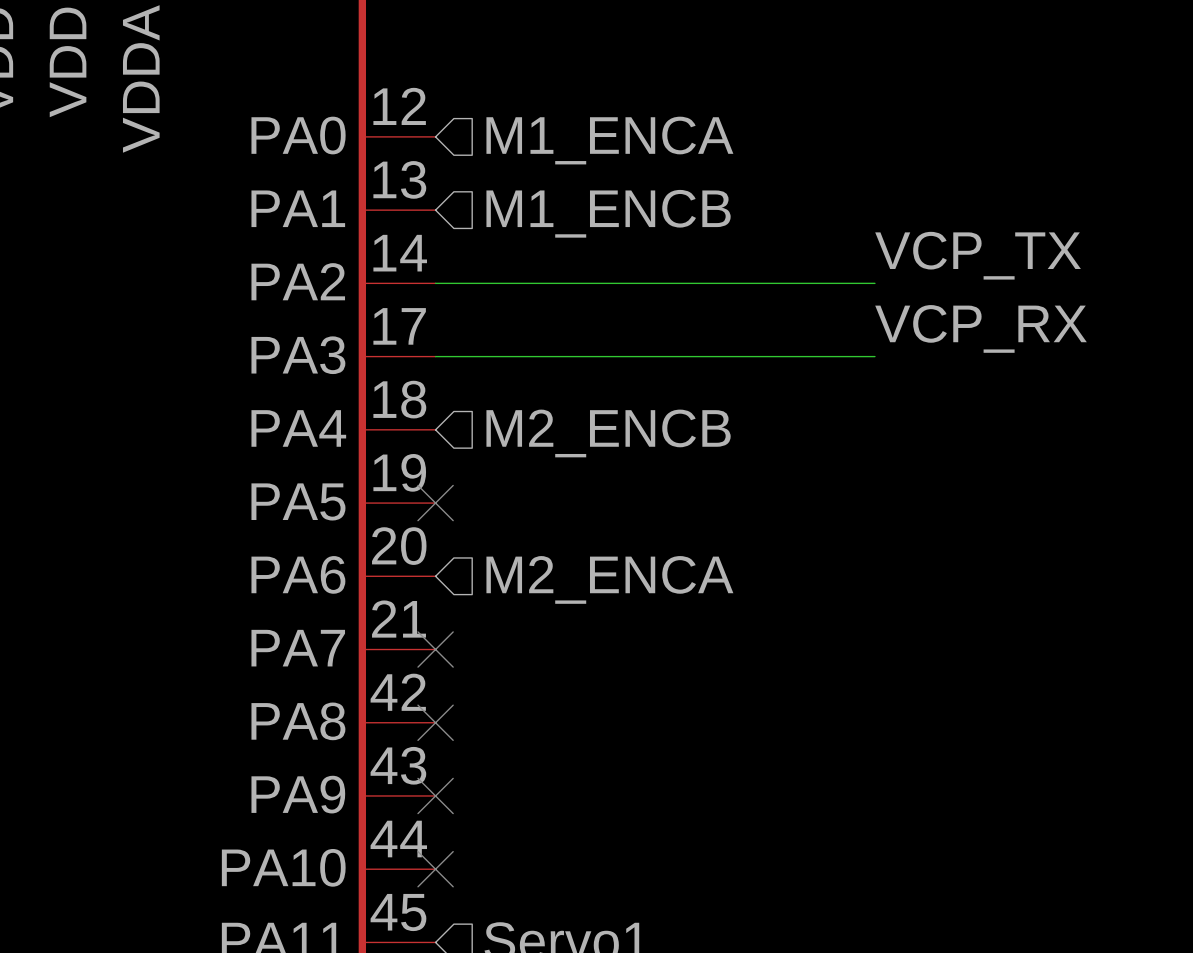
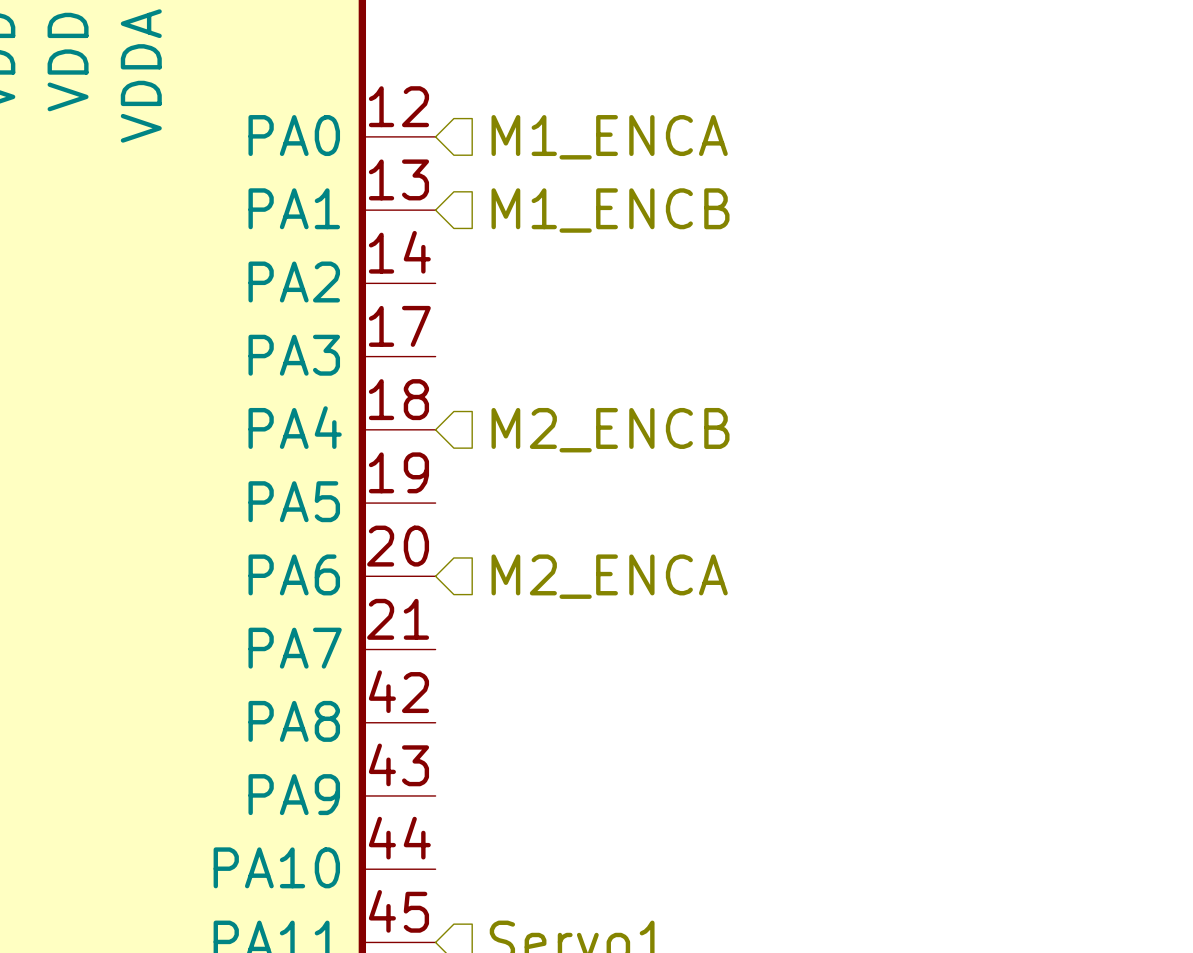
label: VCP_TX (978, 255) -> none
wire: (435, 283) (874, 283) -> none
label: VCP_RX (981, 328) -> none
wire: (435, 356) (874, 356) -> none
no-connect mark: (435, 503) -> none
no-connect mark: (435, 649) -> none
no-connect mark: (435, 722) -> none
no-connect mark: (435, 795) -> none
no-connect mark: (435, 869) -> none

